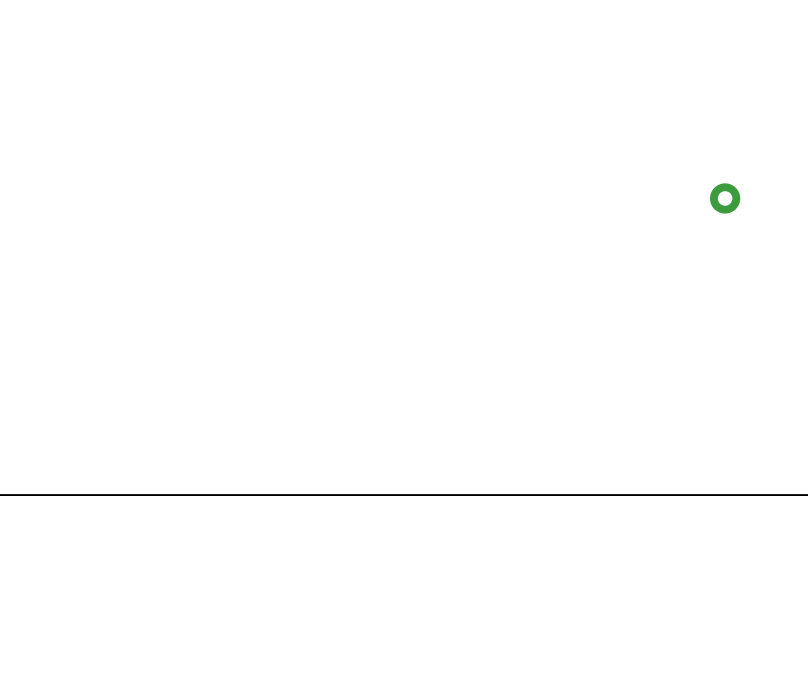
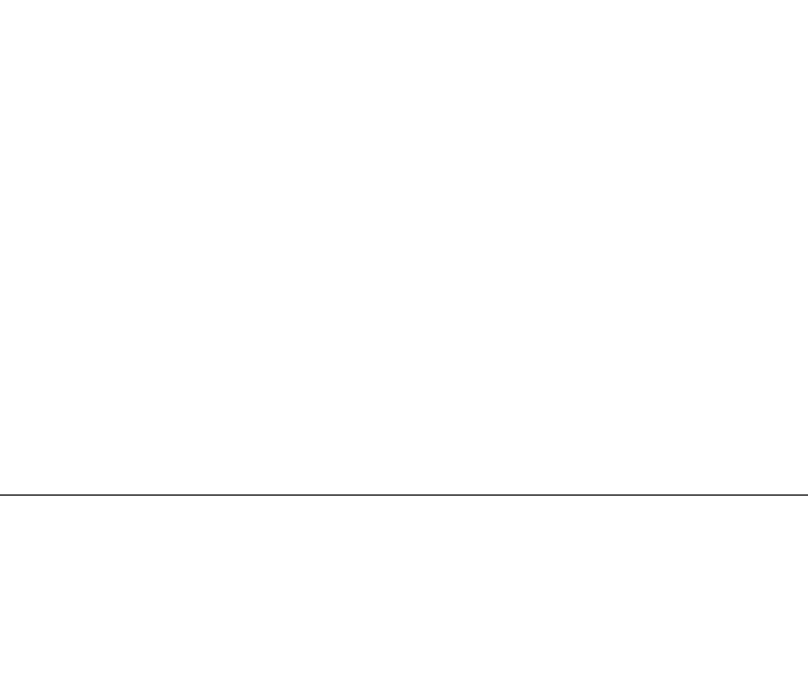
via: (725, 198) -> none

